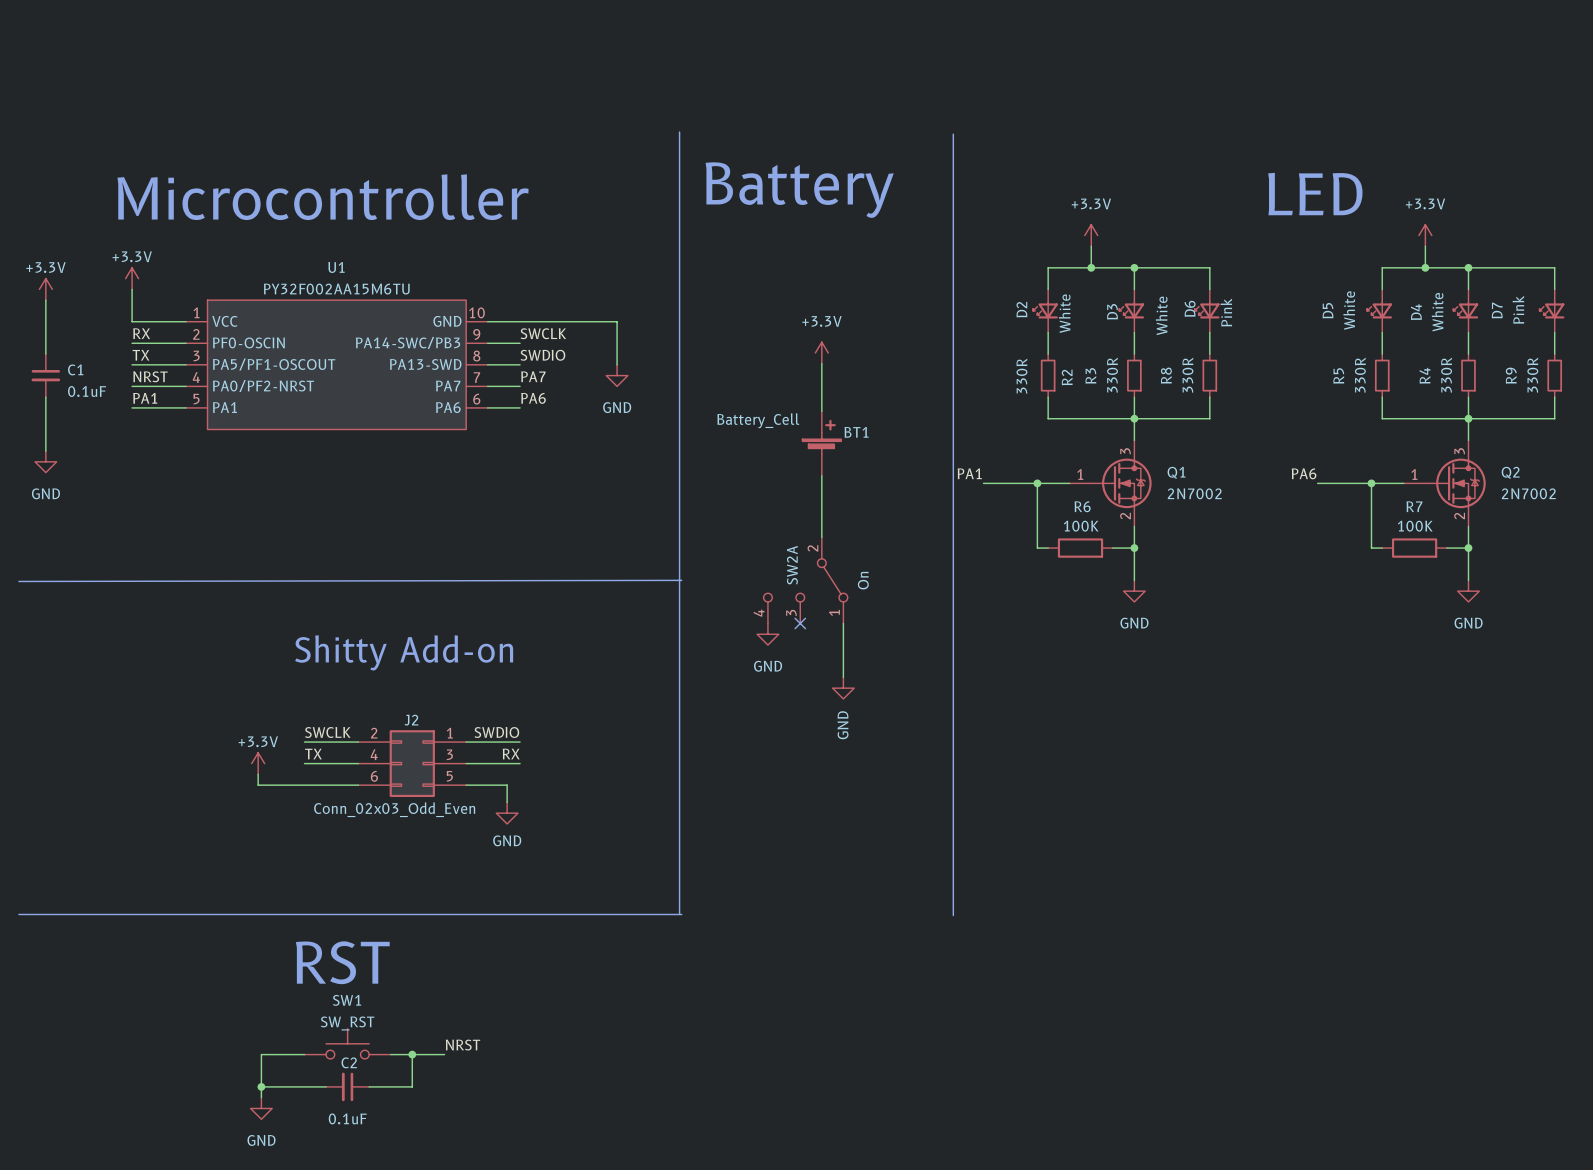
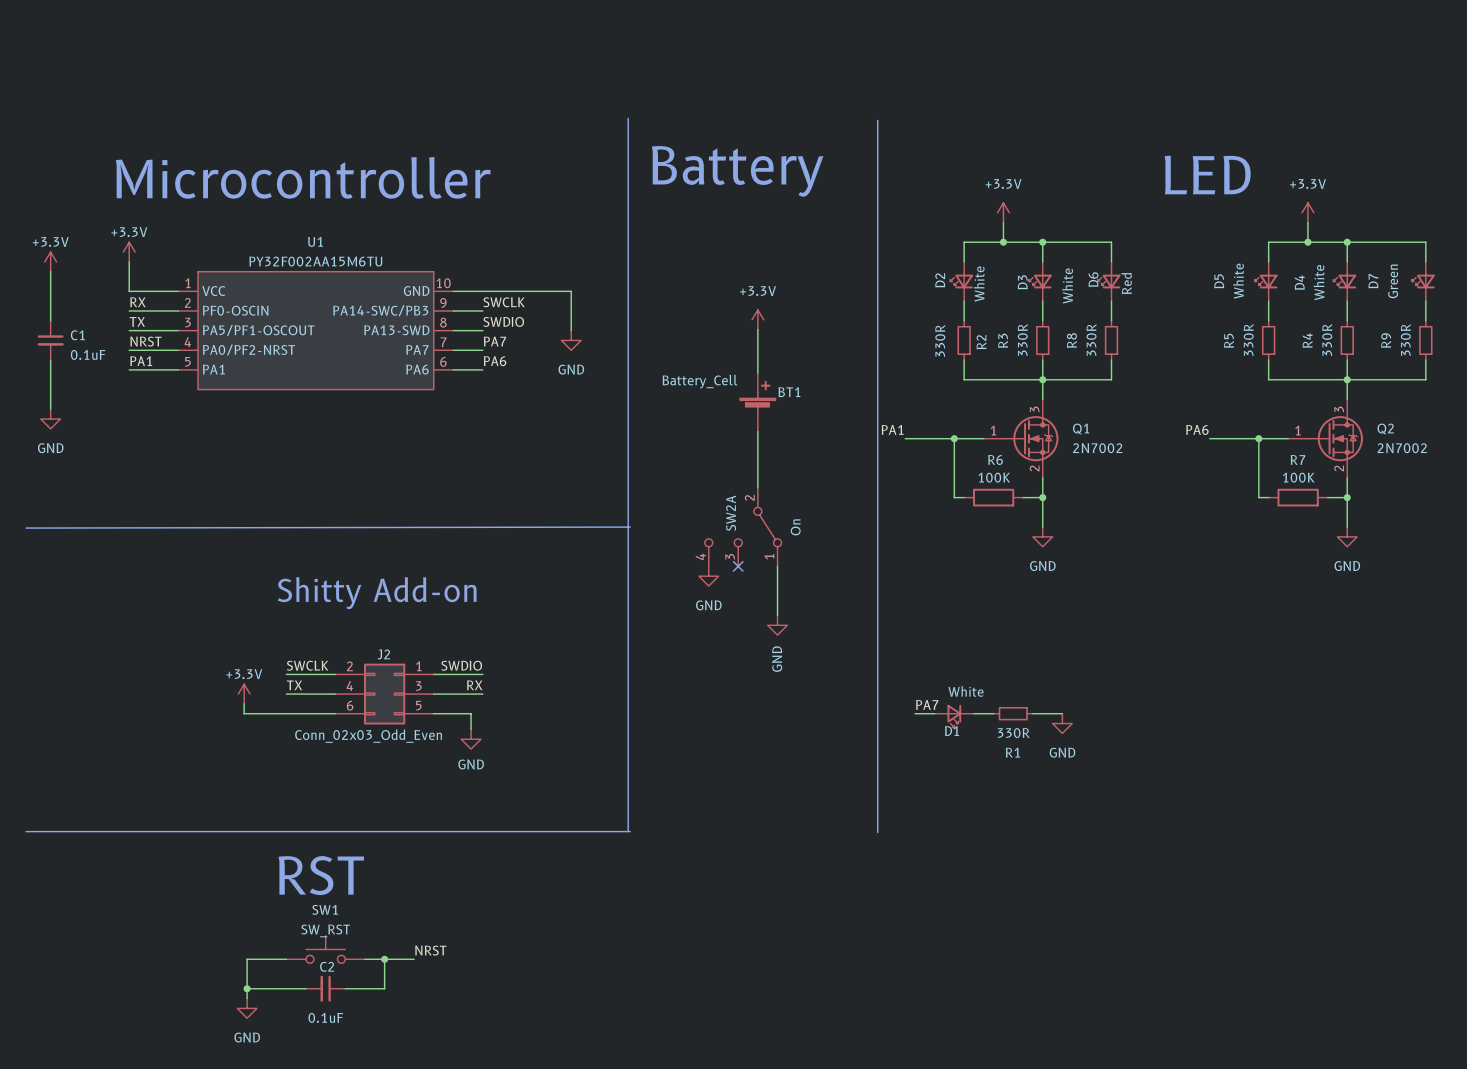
D7 value: Pink (1518, 309) -> Green (1393, 281)
D6 value: Pink (1226, 312) -> Red (1126, 283)
label: none -> PA7 (927, 704)
wire: none -> (915, 713) (934, 713)
wire: none -> (973, 713) (993, 713)
R1: none -> 330R (1013, 713)
wire: none -> (1032, 713) (1062, 713)
D1: none -> White (954, 716)
power symbol: none -> GND (1062, 723)

